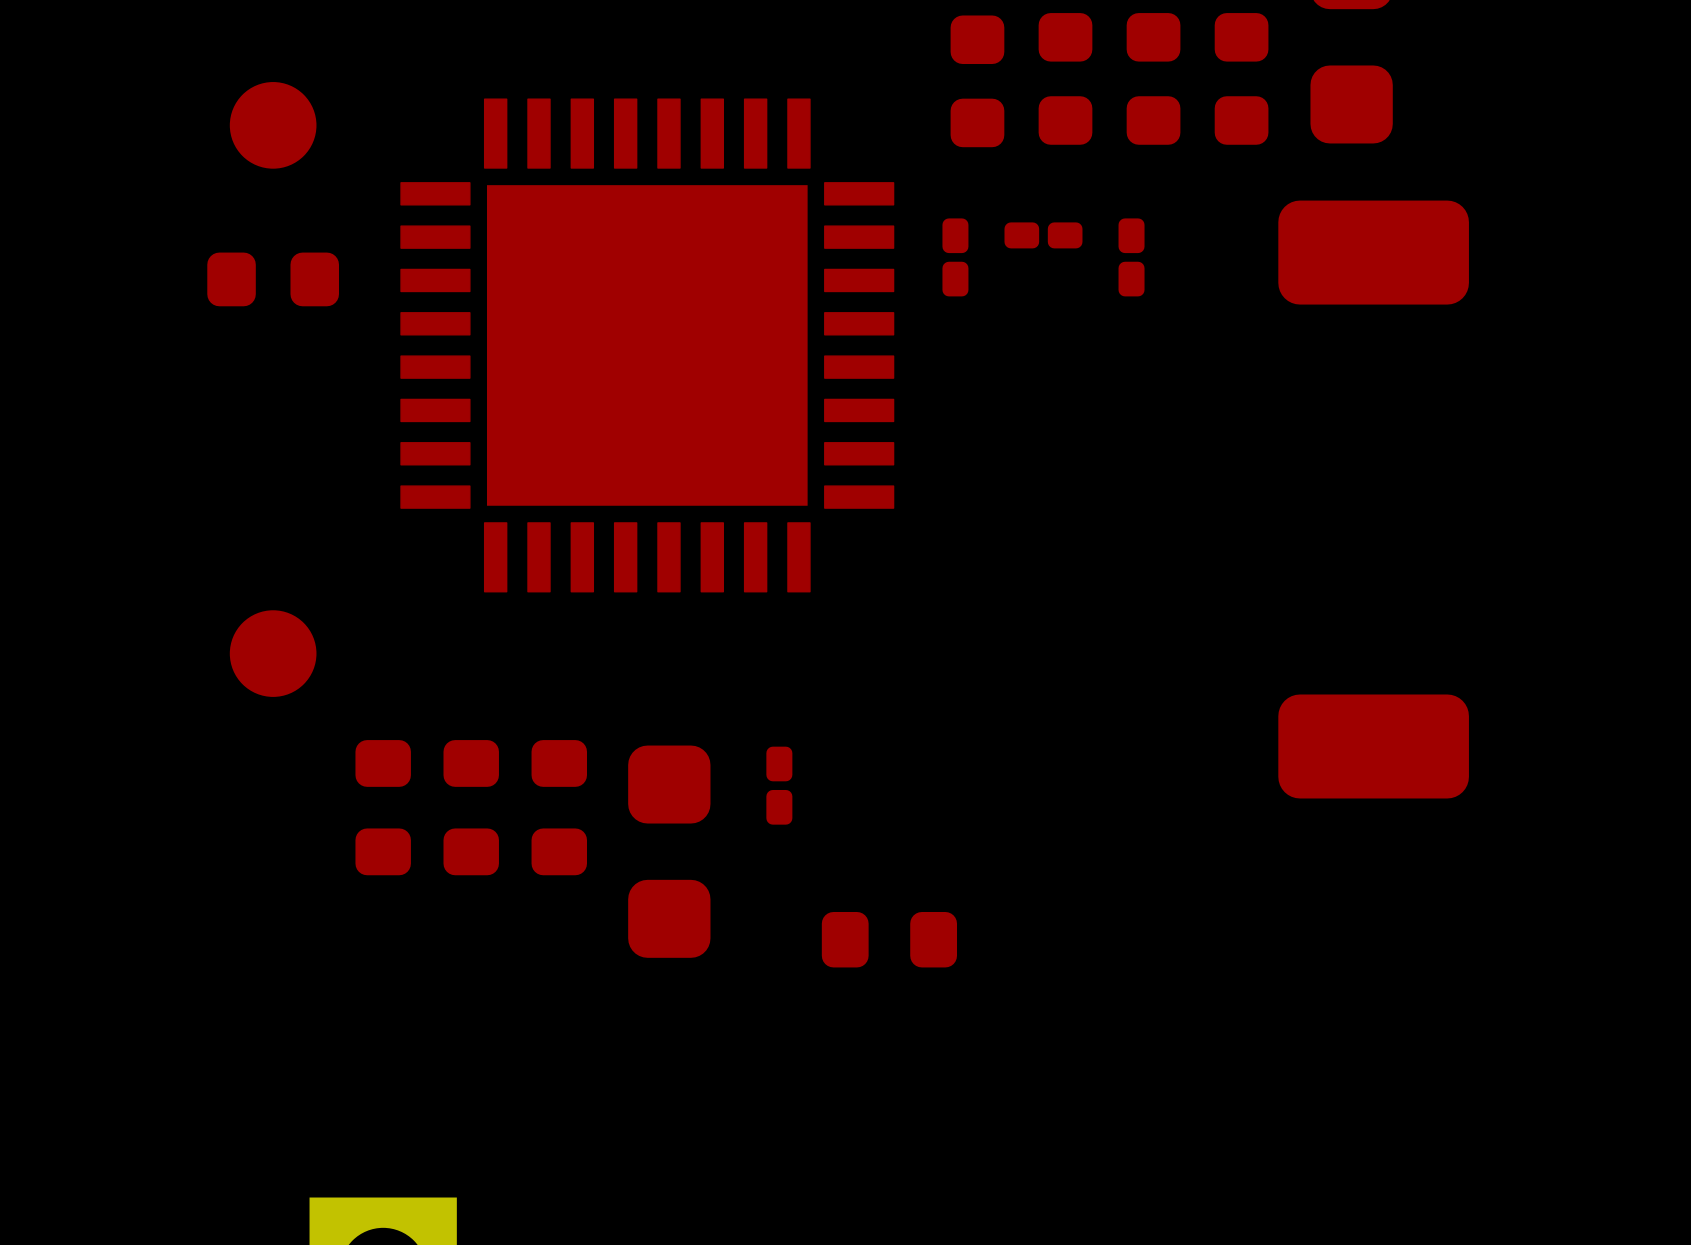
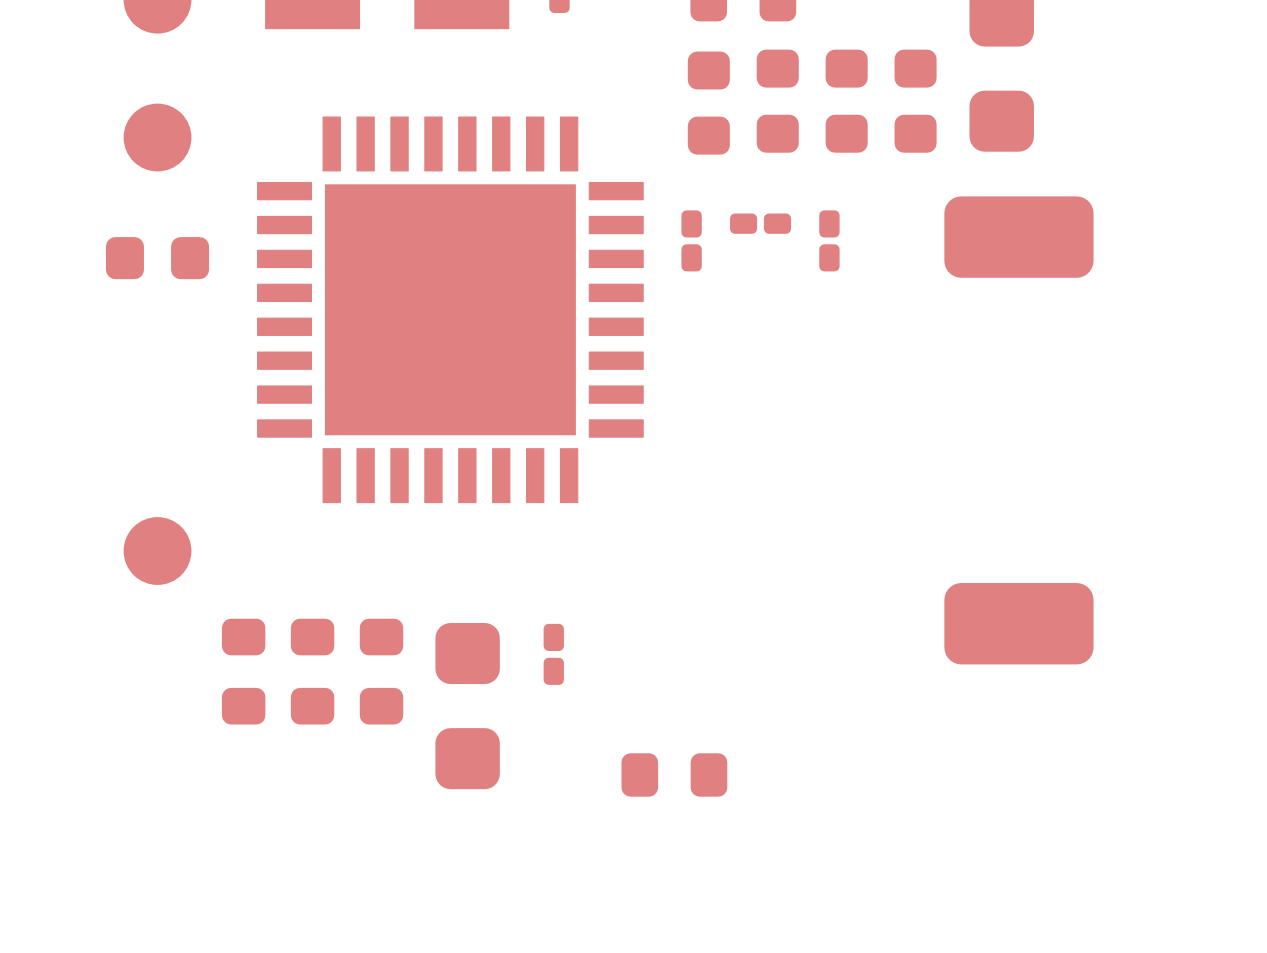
part position: (889, 939) -> (674, 774)

